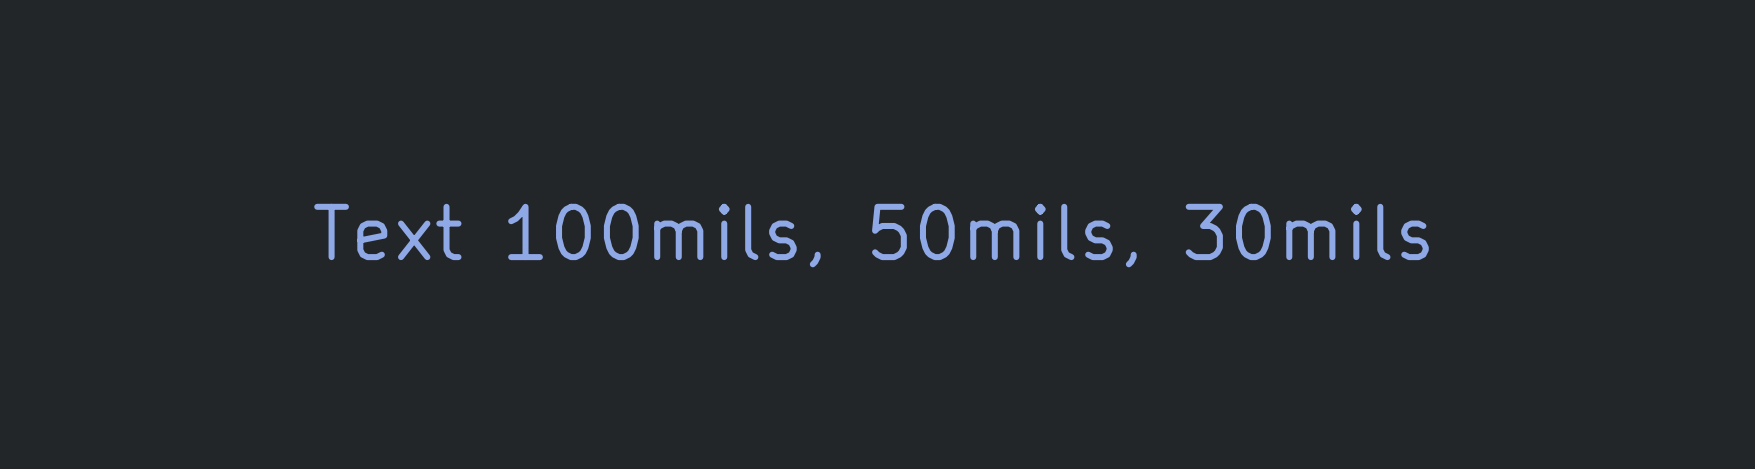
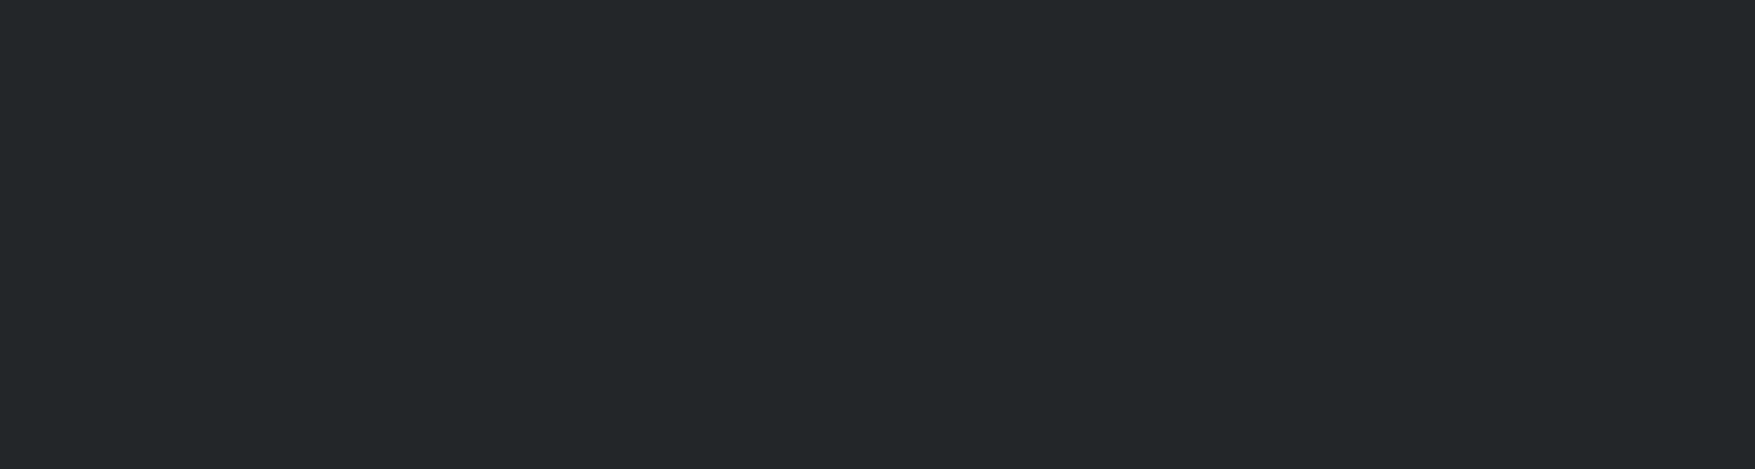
text: Text 100mils, 50mils, 30mils (871, 235) -> none

